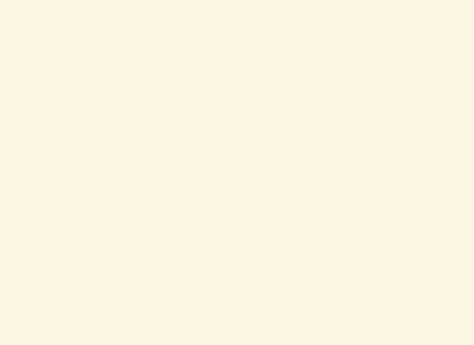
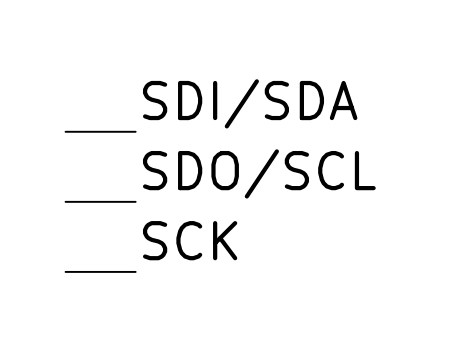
label: none -> SDI/SDA (250, 103)
wire: none -> (65, 131) (135, 131)
label: none -> SDO/SCL (259, 173)
wire: none -> (65, 201) (135, 201)
label: none -> SCK (190, 240)
wire: none -> (65, 271) (135, 271)

